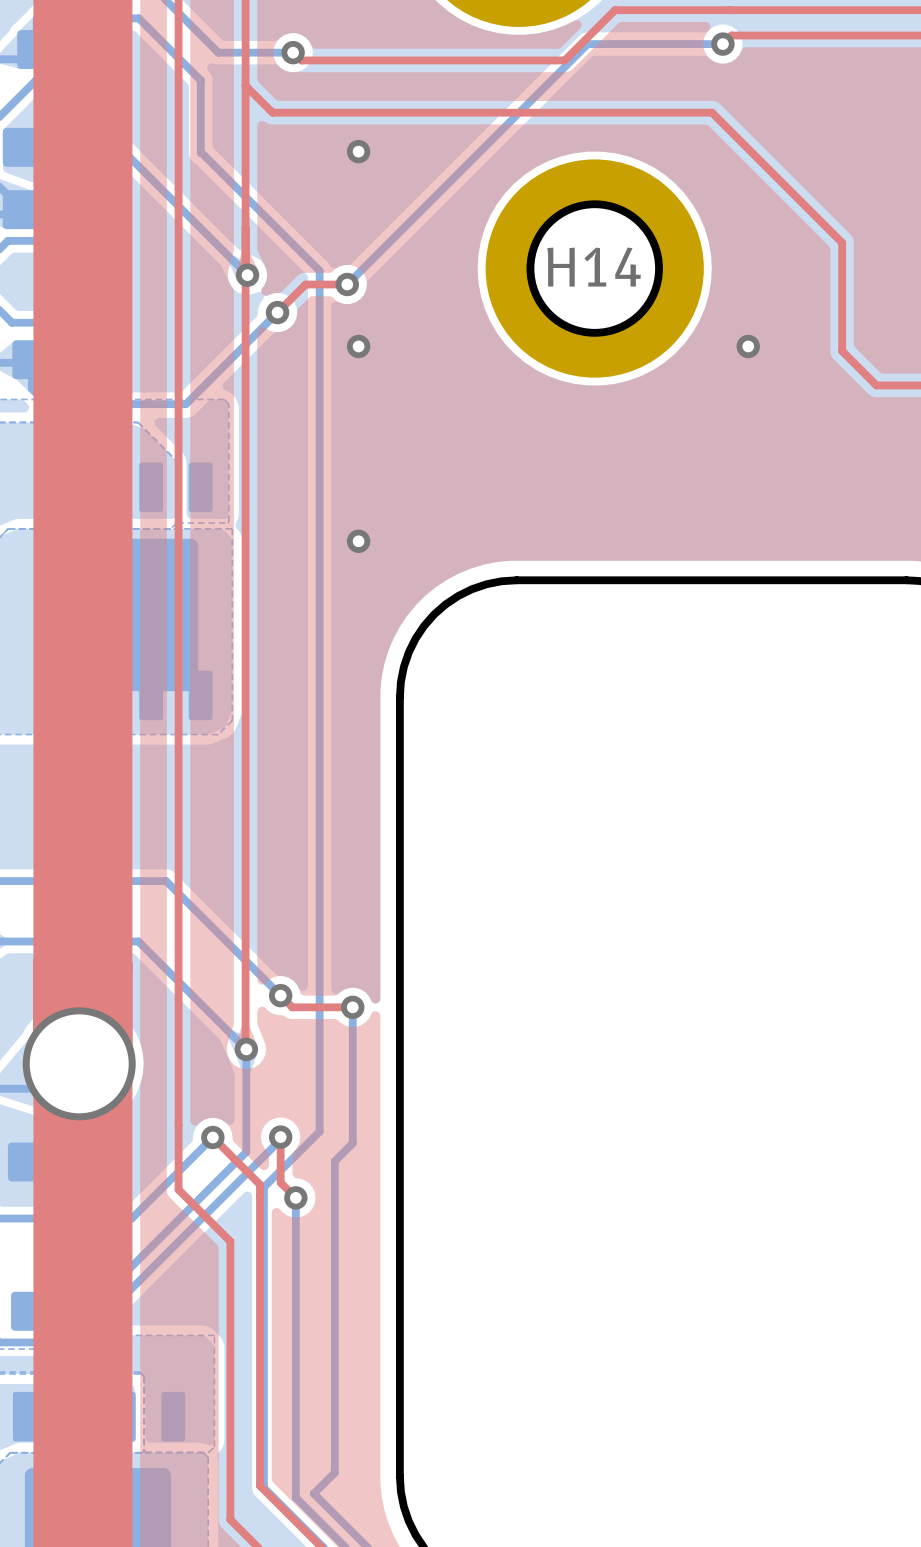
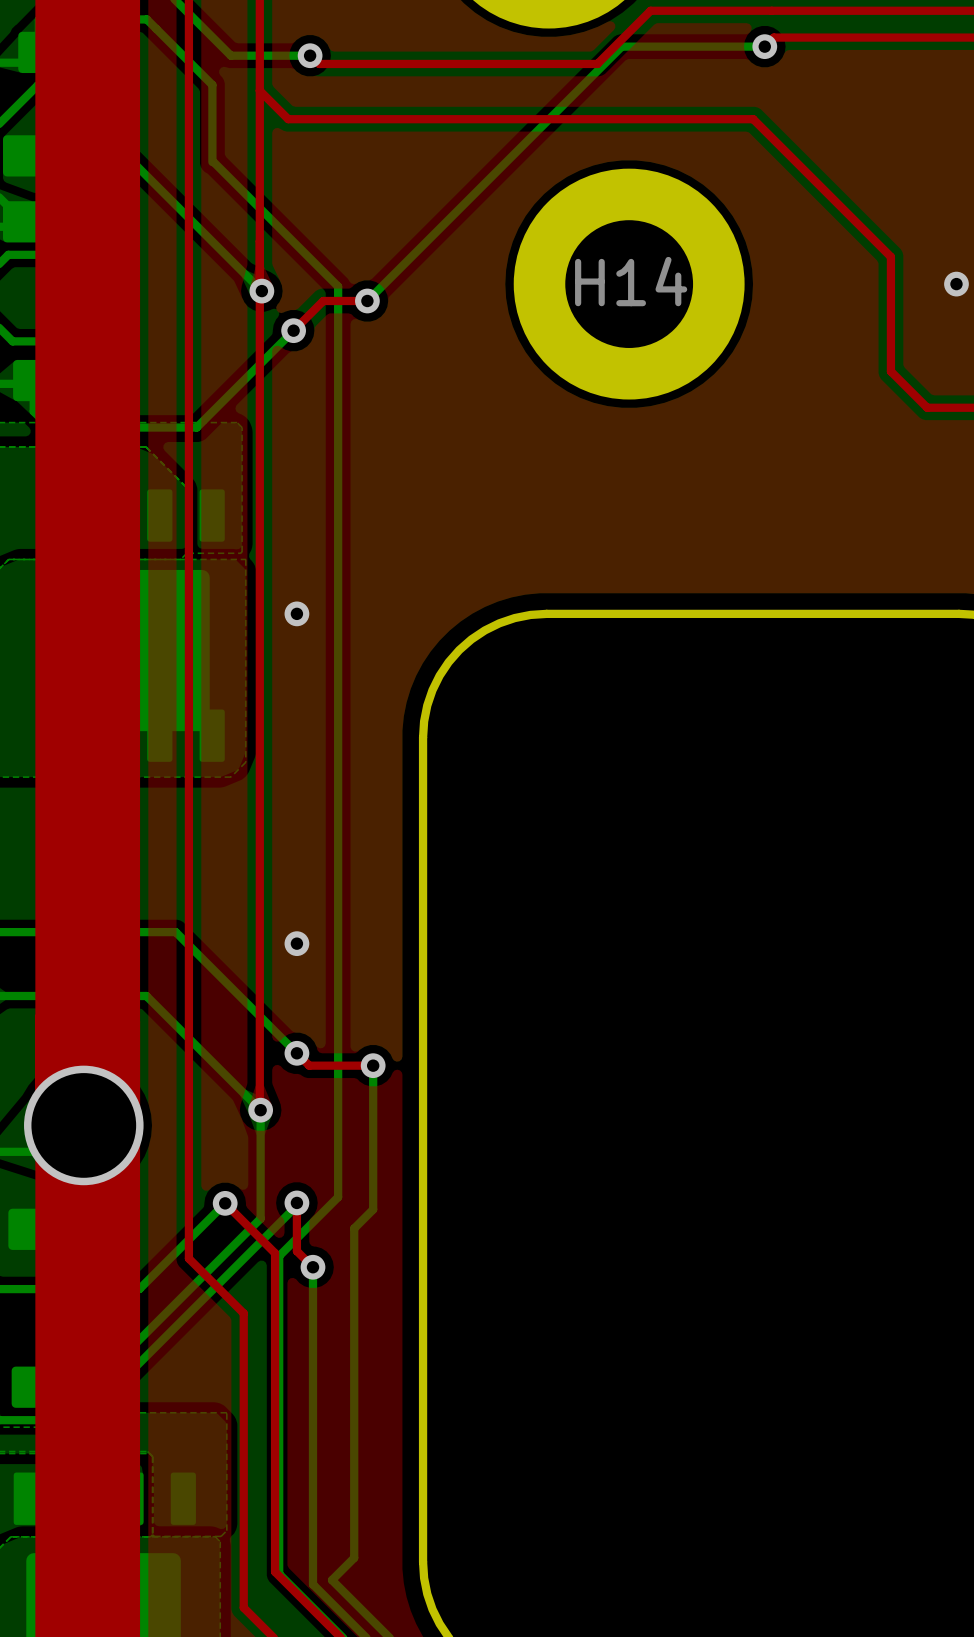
via: (358, 151) -> none
via: none -> (956, 284)
via: (358, 346) -> none
via: (748, 346) -> none
via position: (358, 541) -> (296, 613)
via: none -> (296, 943)

